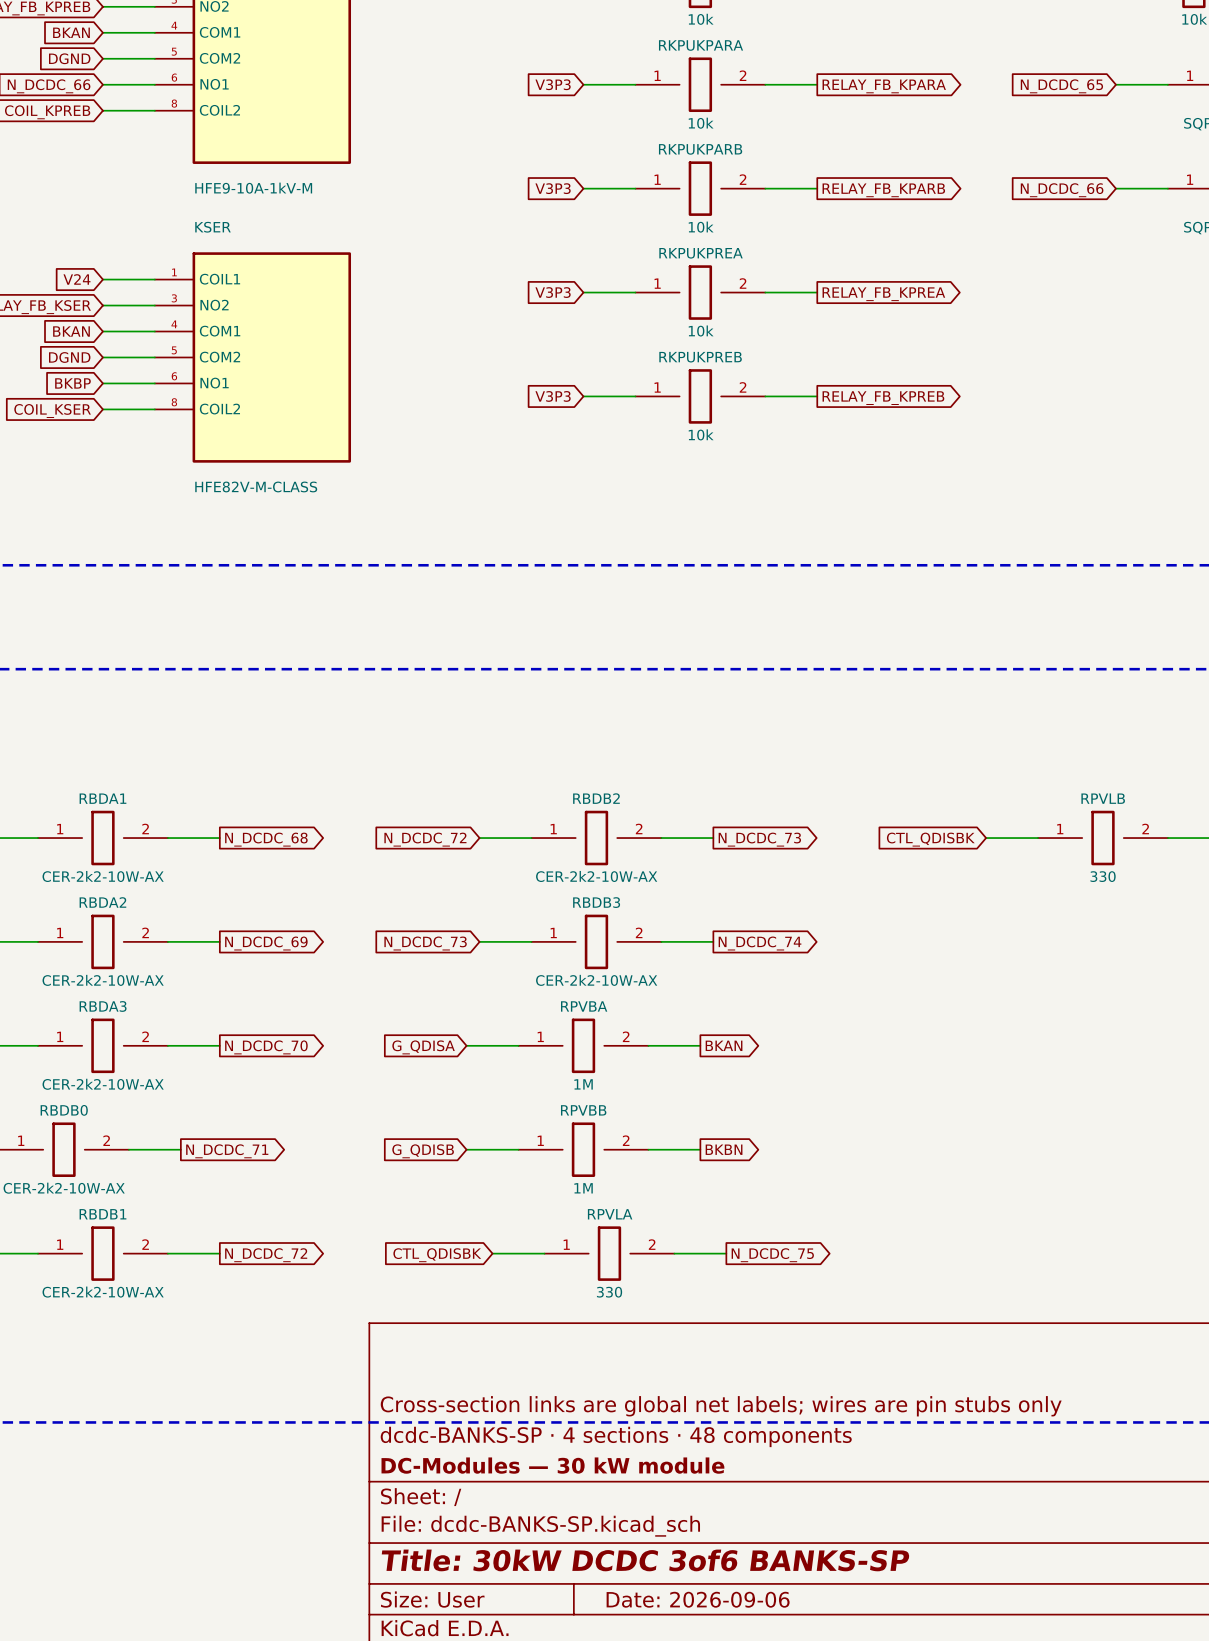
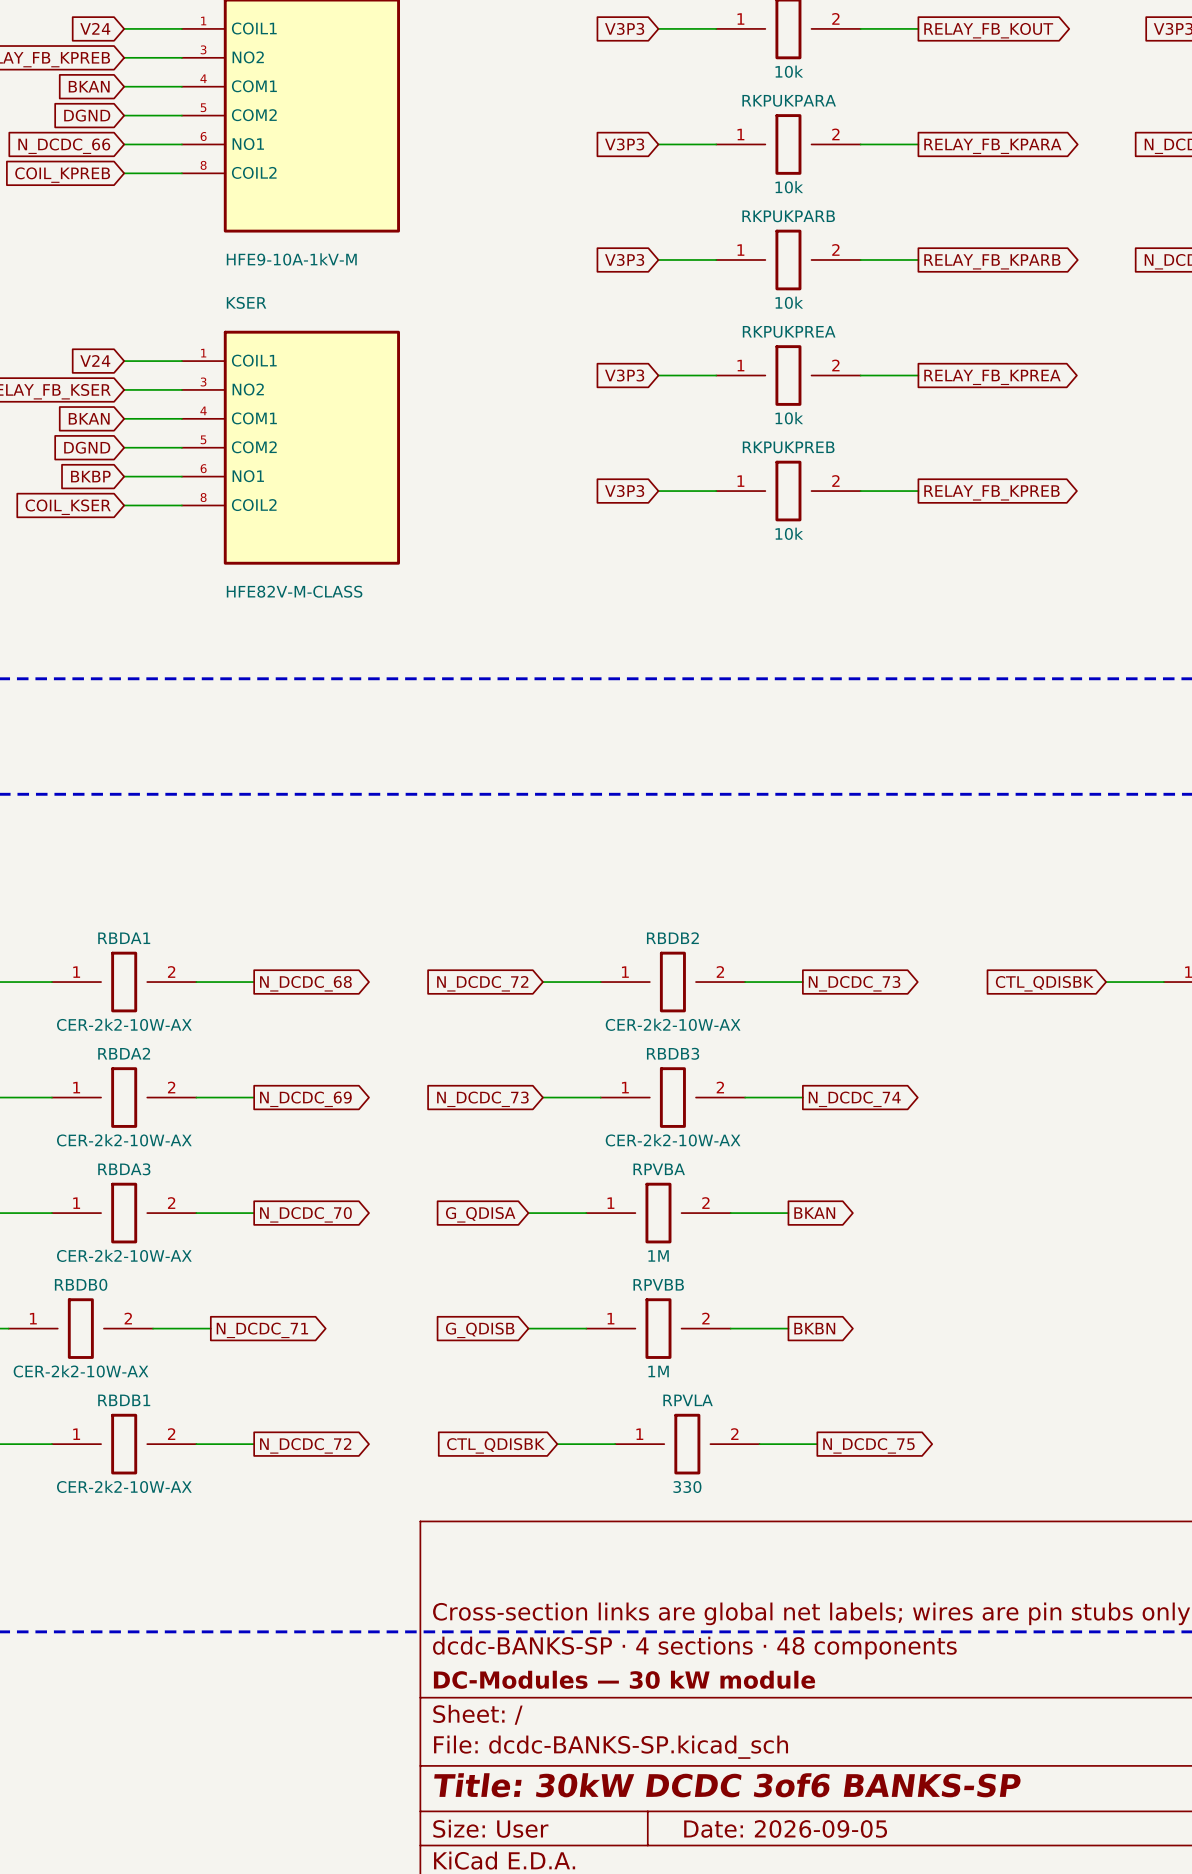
title block: Date: 2026-09-06 (698, 1599) -> Date: 2026-09-05 (785, 1828)

